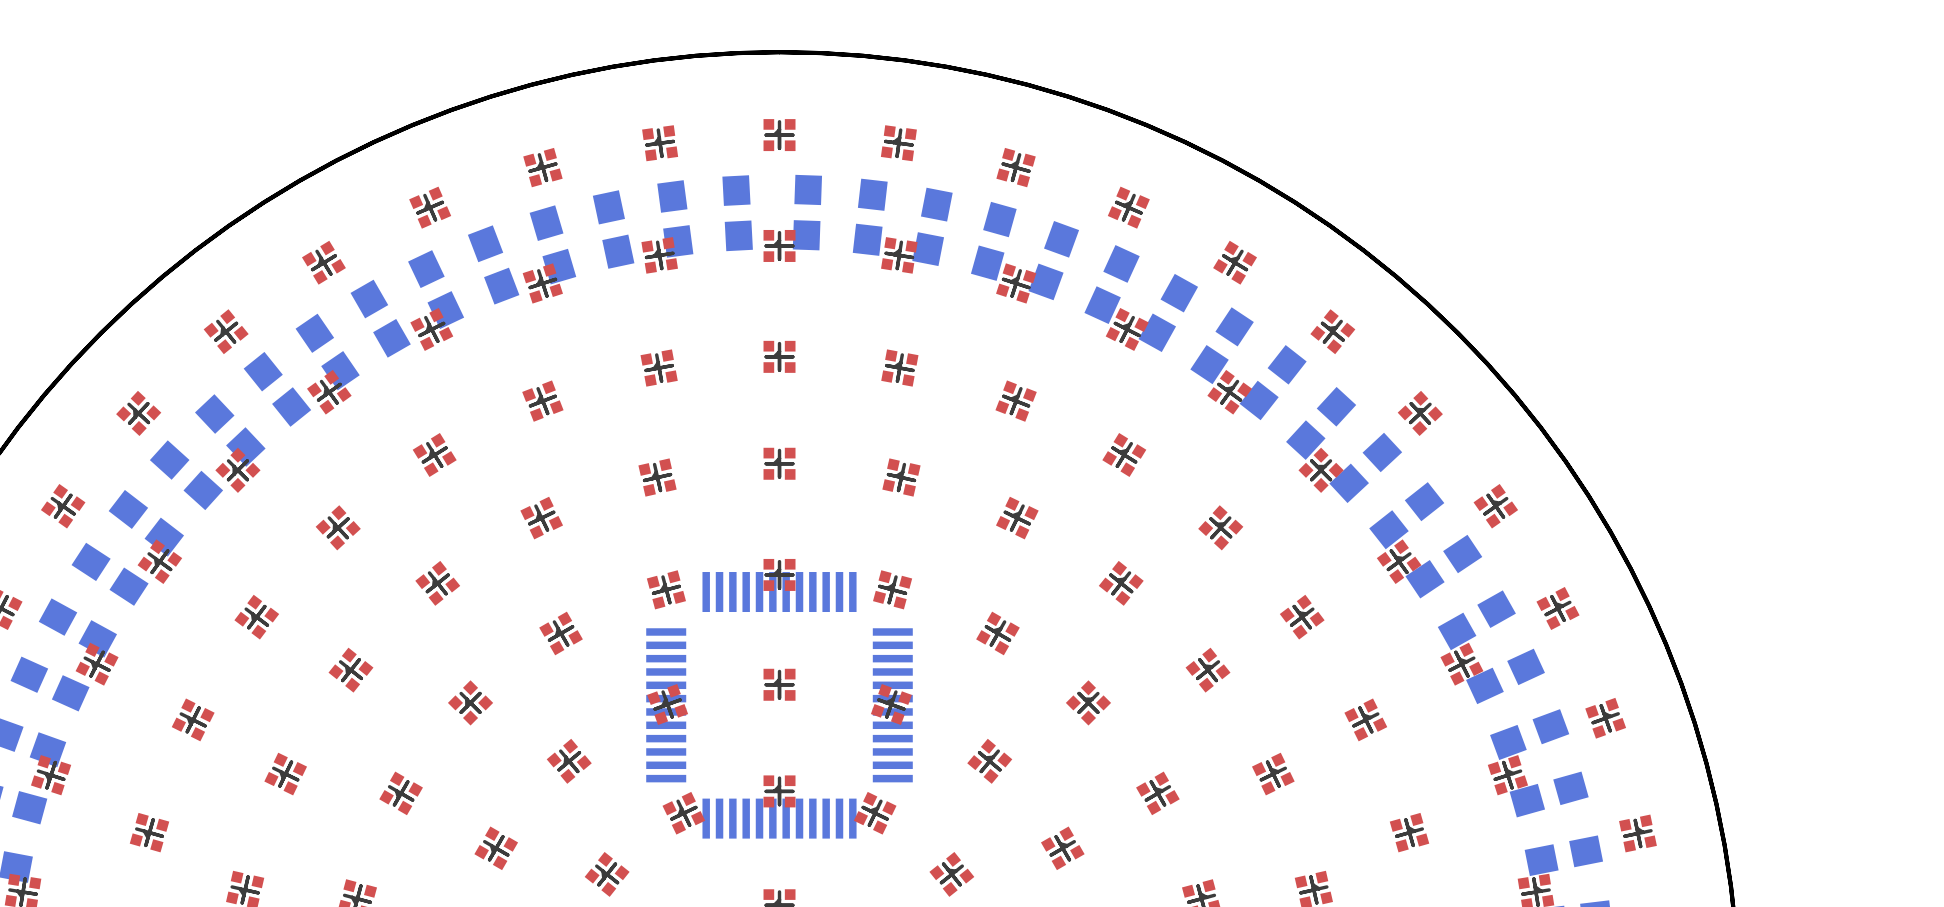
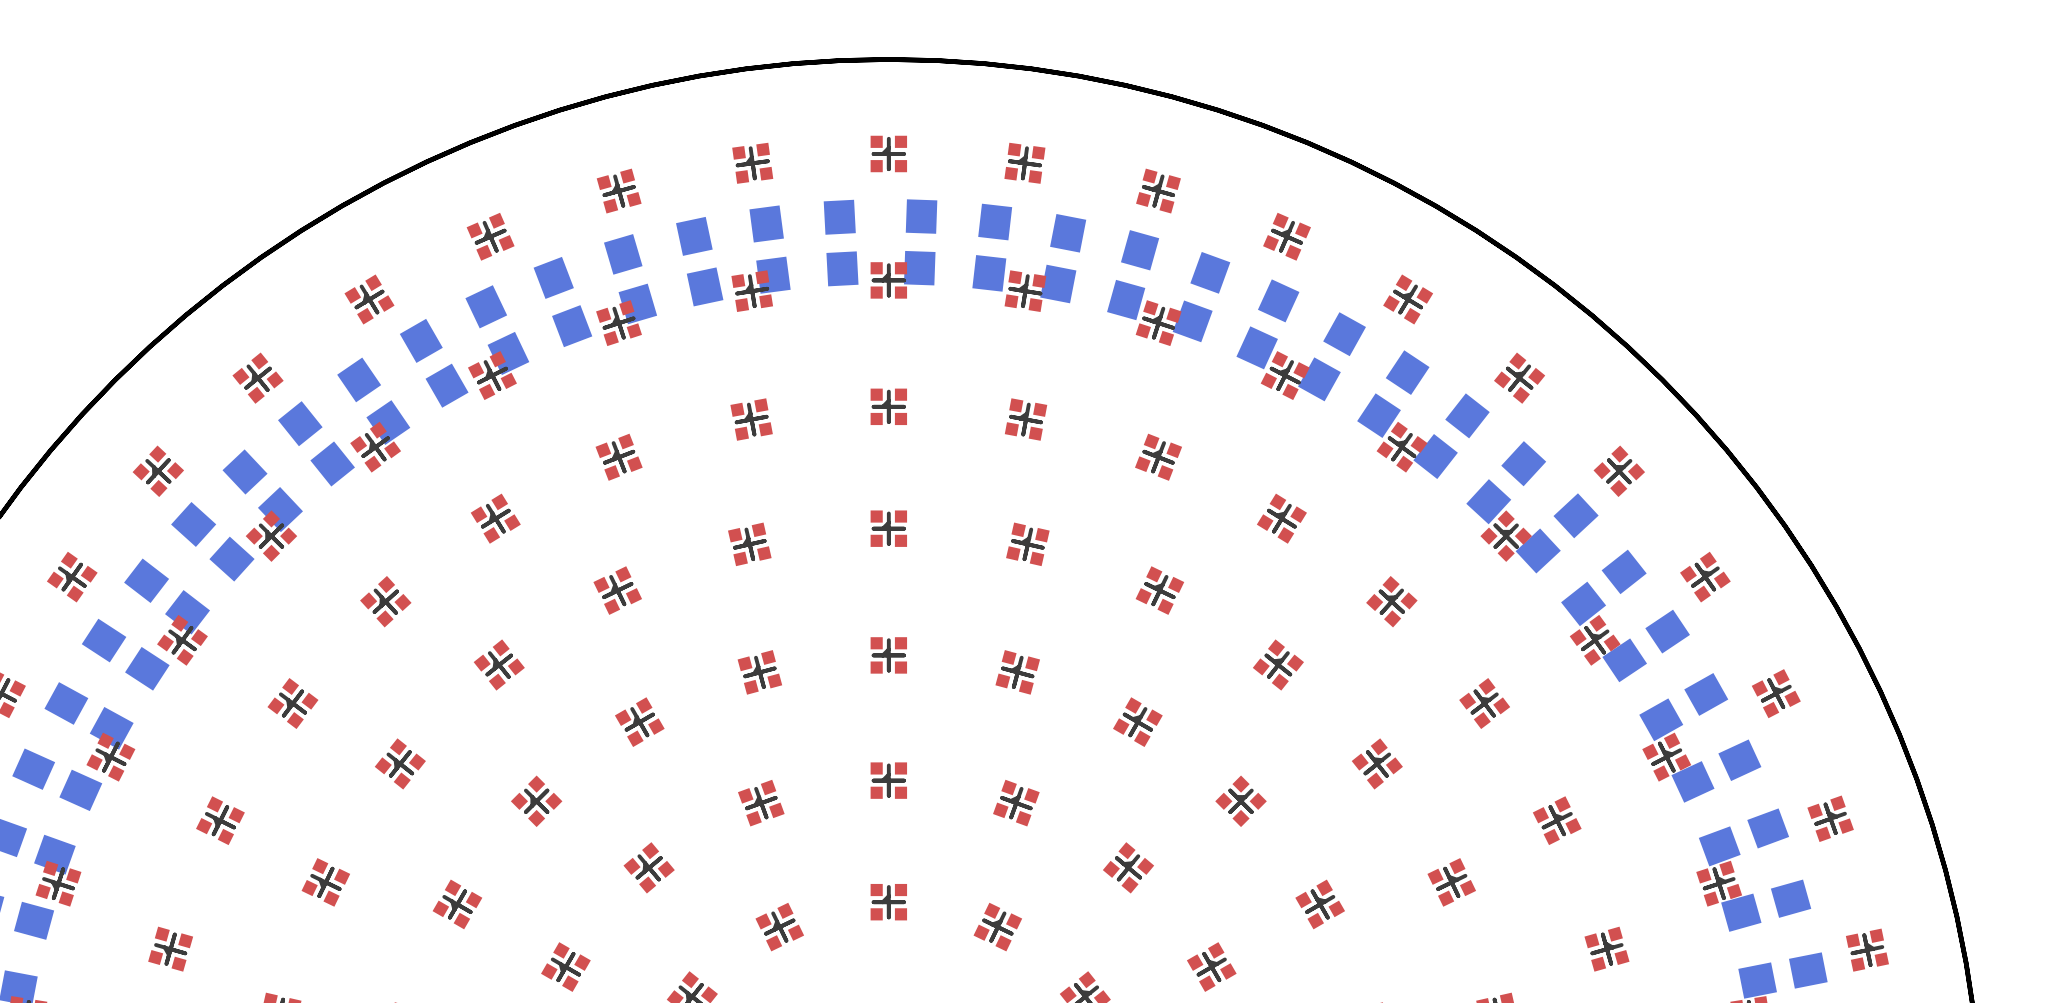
part: (779, 705) -> none

